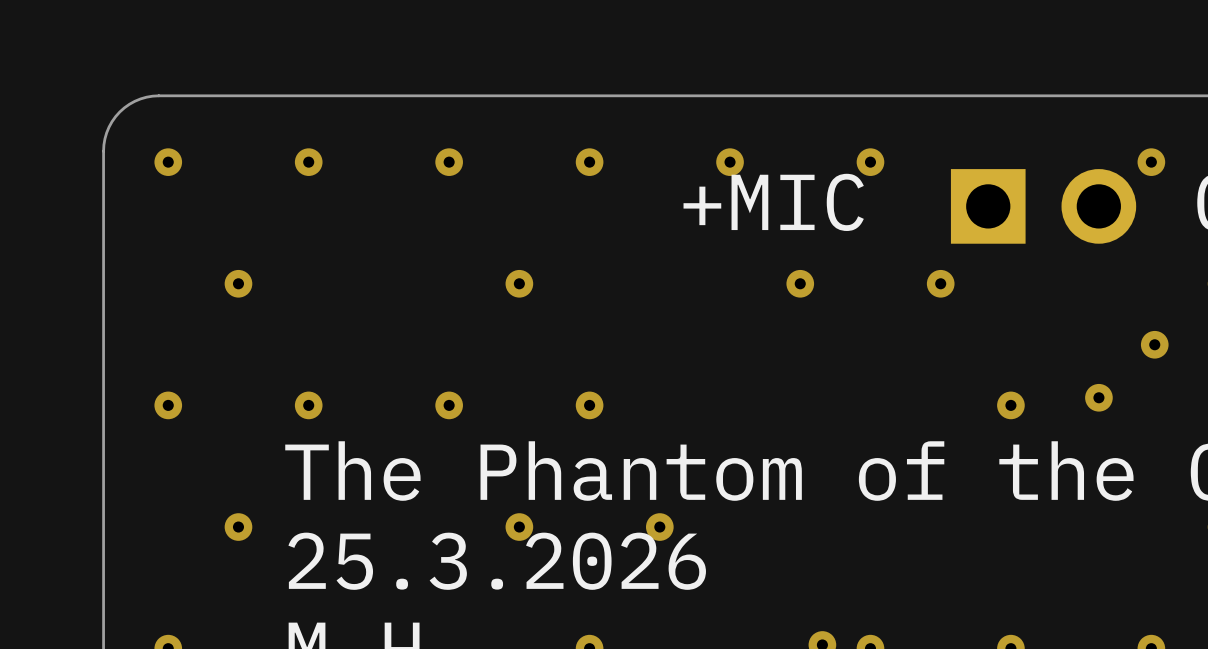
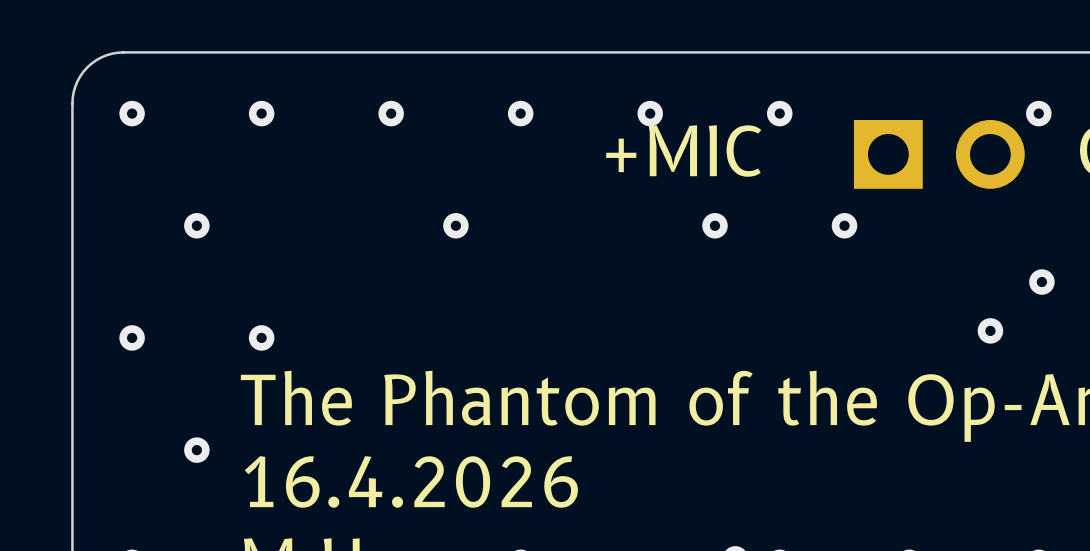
via: (449, 405) -> none
via: (589, 405) -> none
via: (1010, 405) -> none
via: (519, 527) -> none
via: (659, 527) -> none
text: 25.3.2026 (497, 561) -> 16.4.2026 (411, 481)

